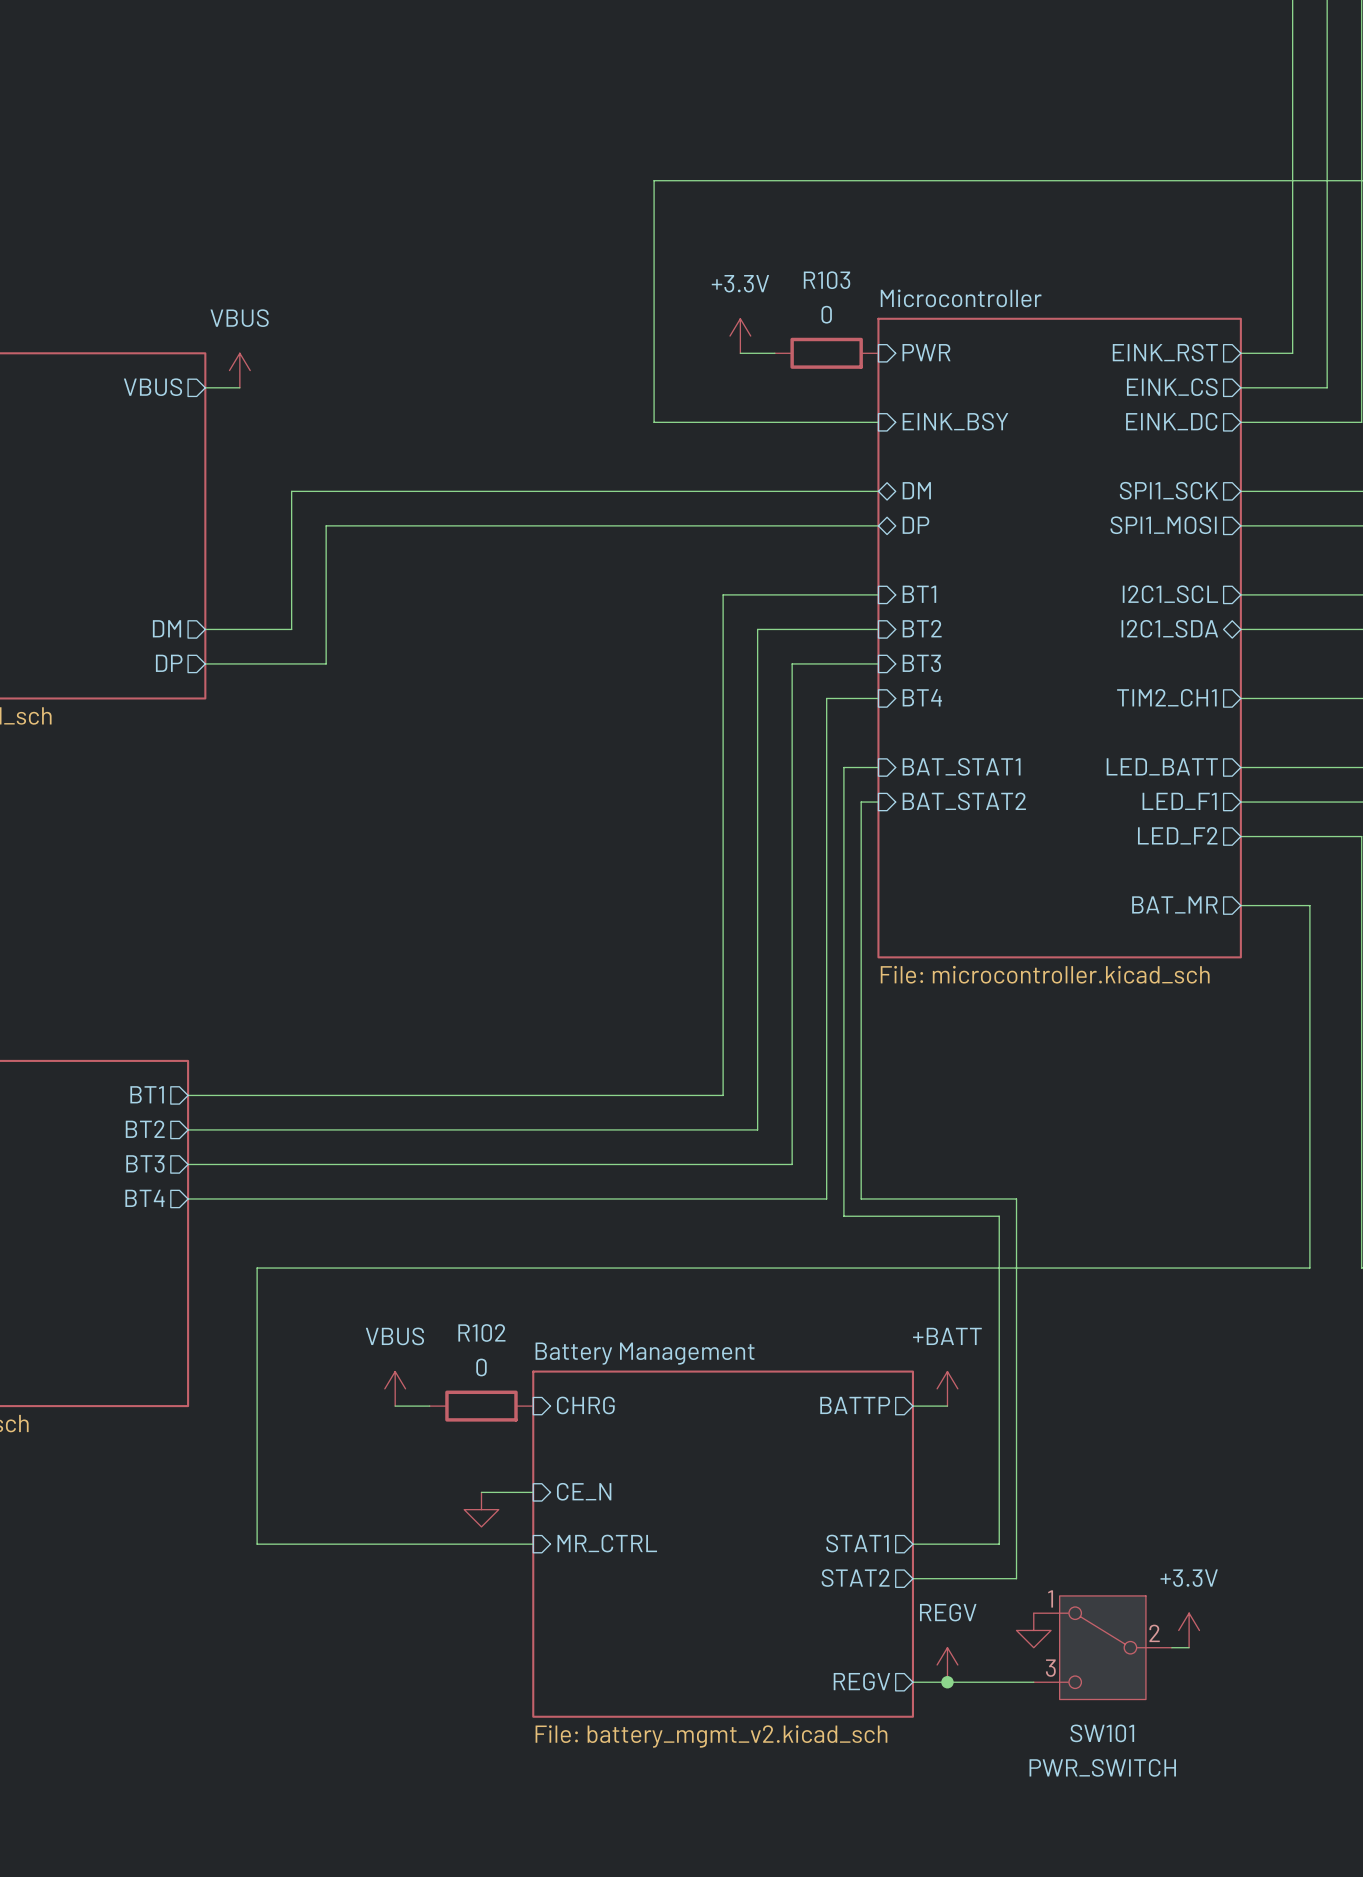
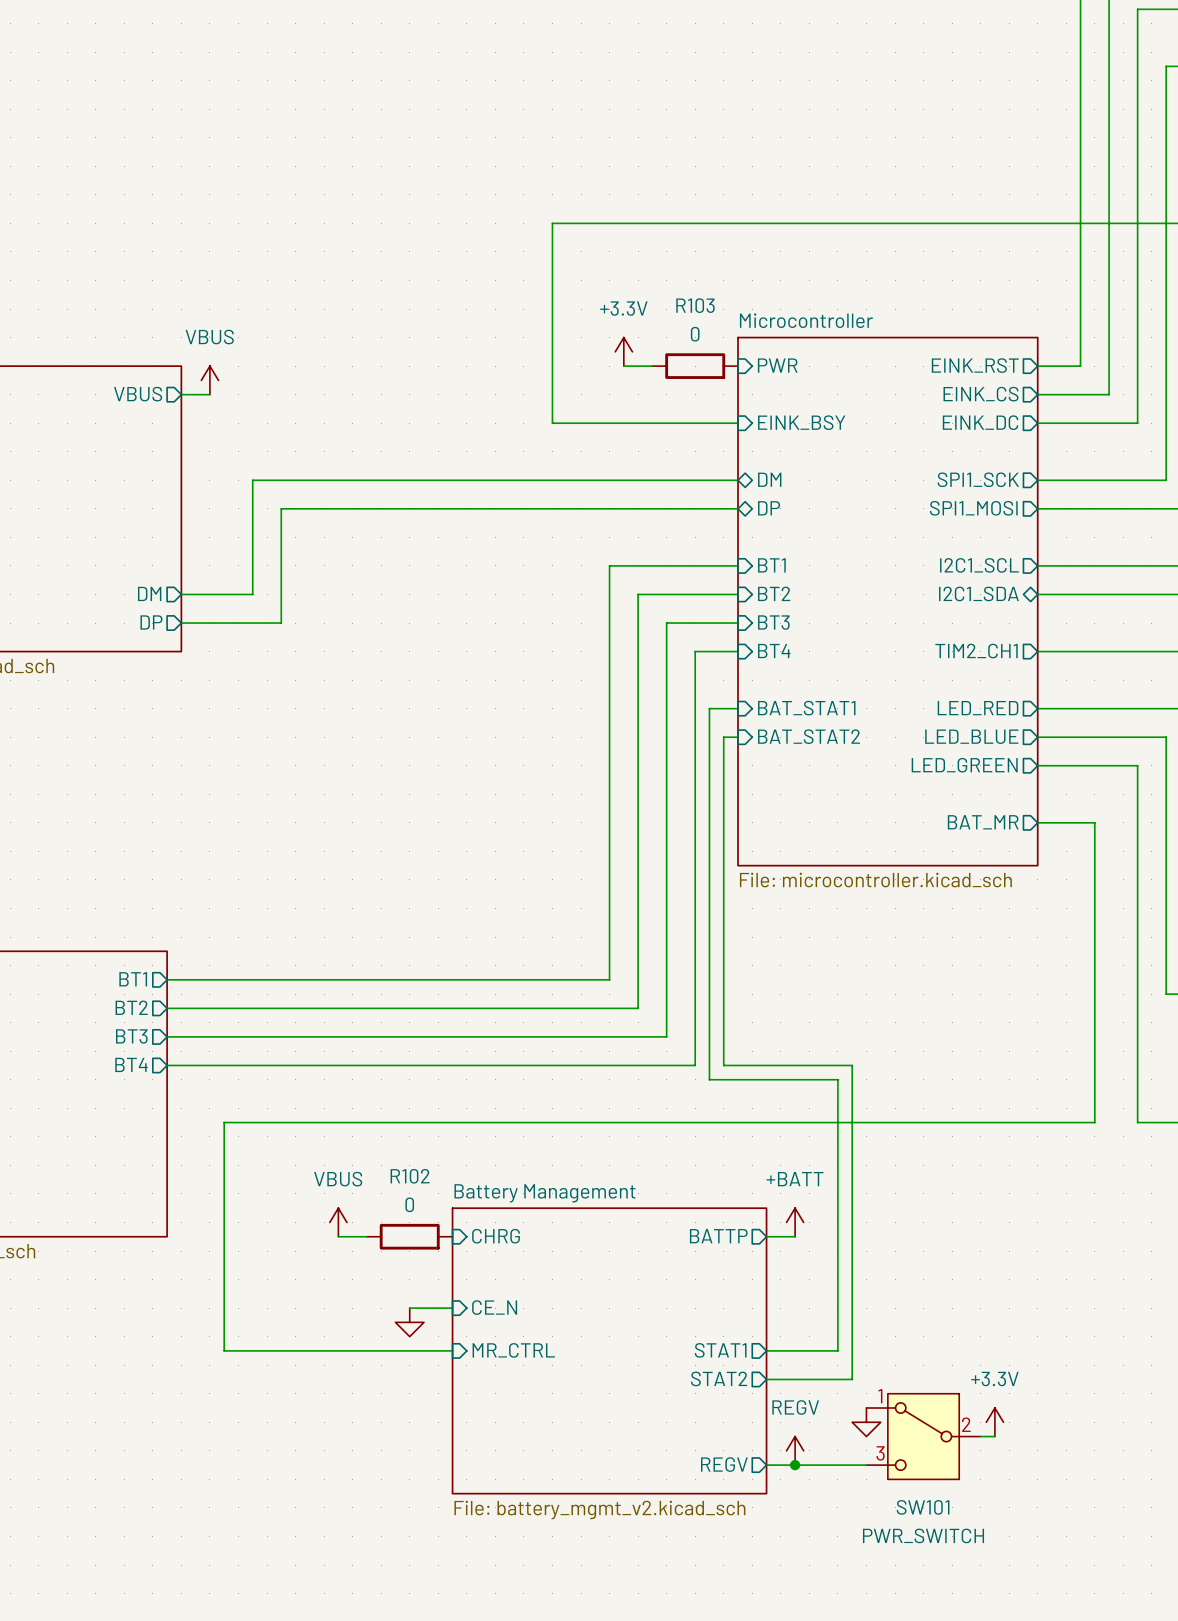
sheet pin: LED_BATT (1162, 766) -> LED_RED (978, 708)
sheet pin: LED_F1 (1179, 801) -> LED_BLUE (971, 736)
sheet pin: LED_F2 (1177, 835) -> LED_GREEN (964, 765)

